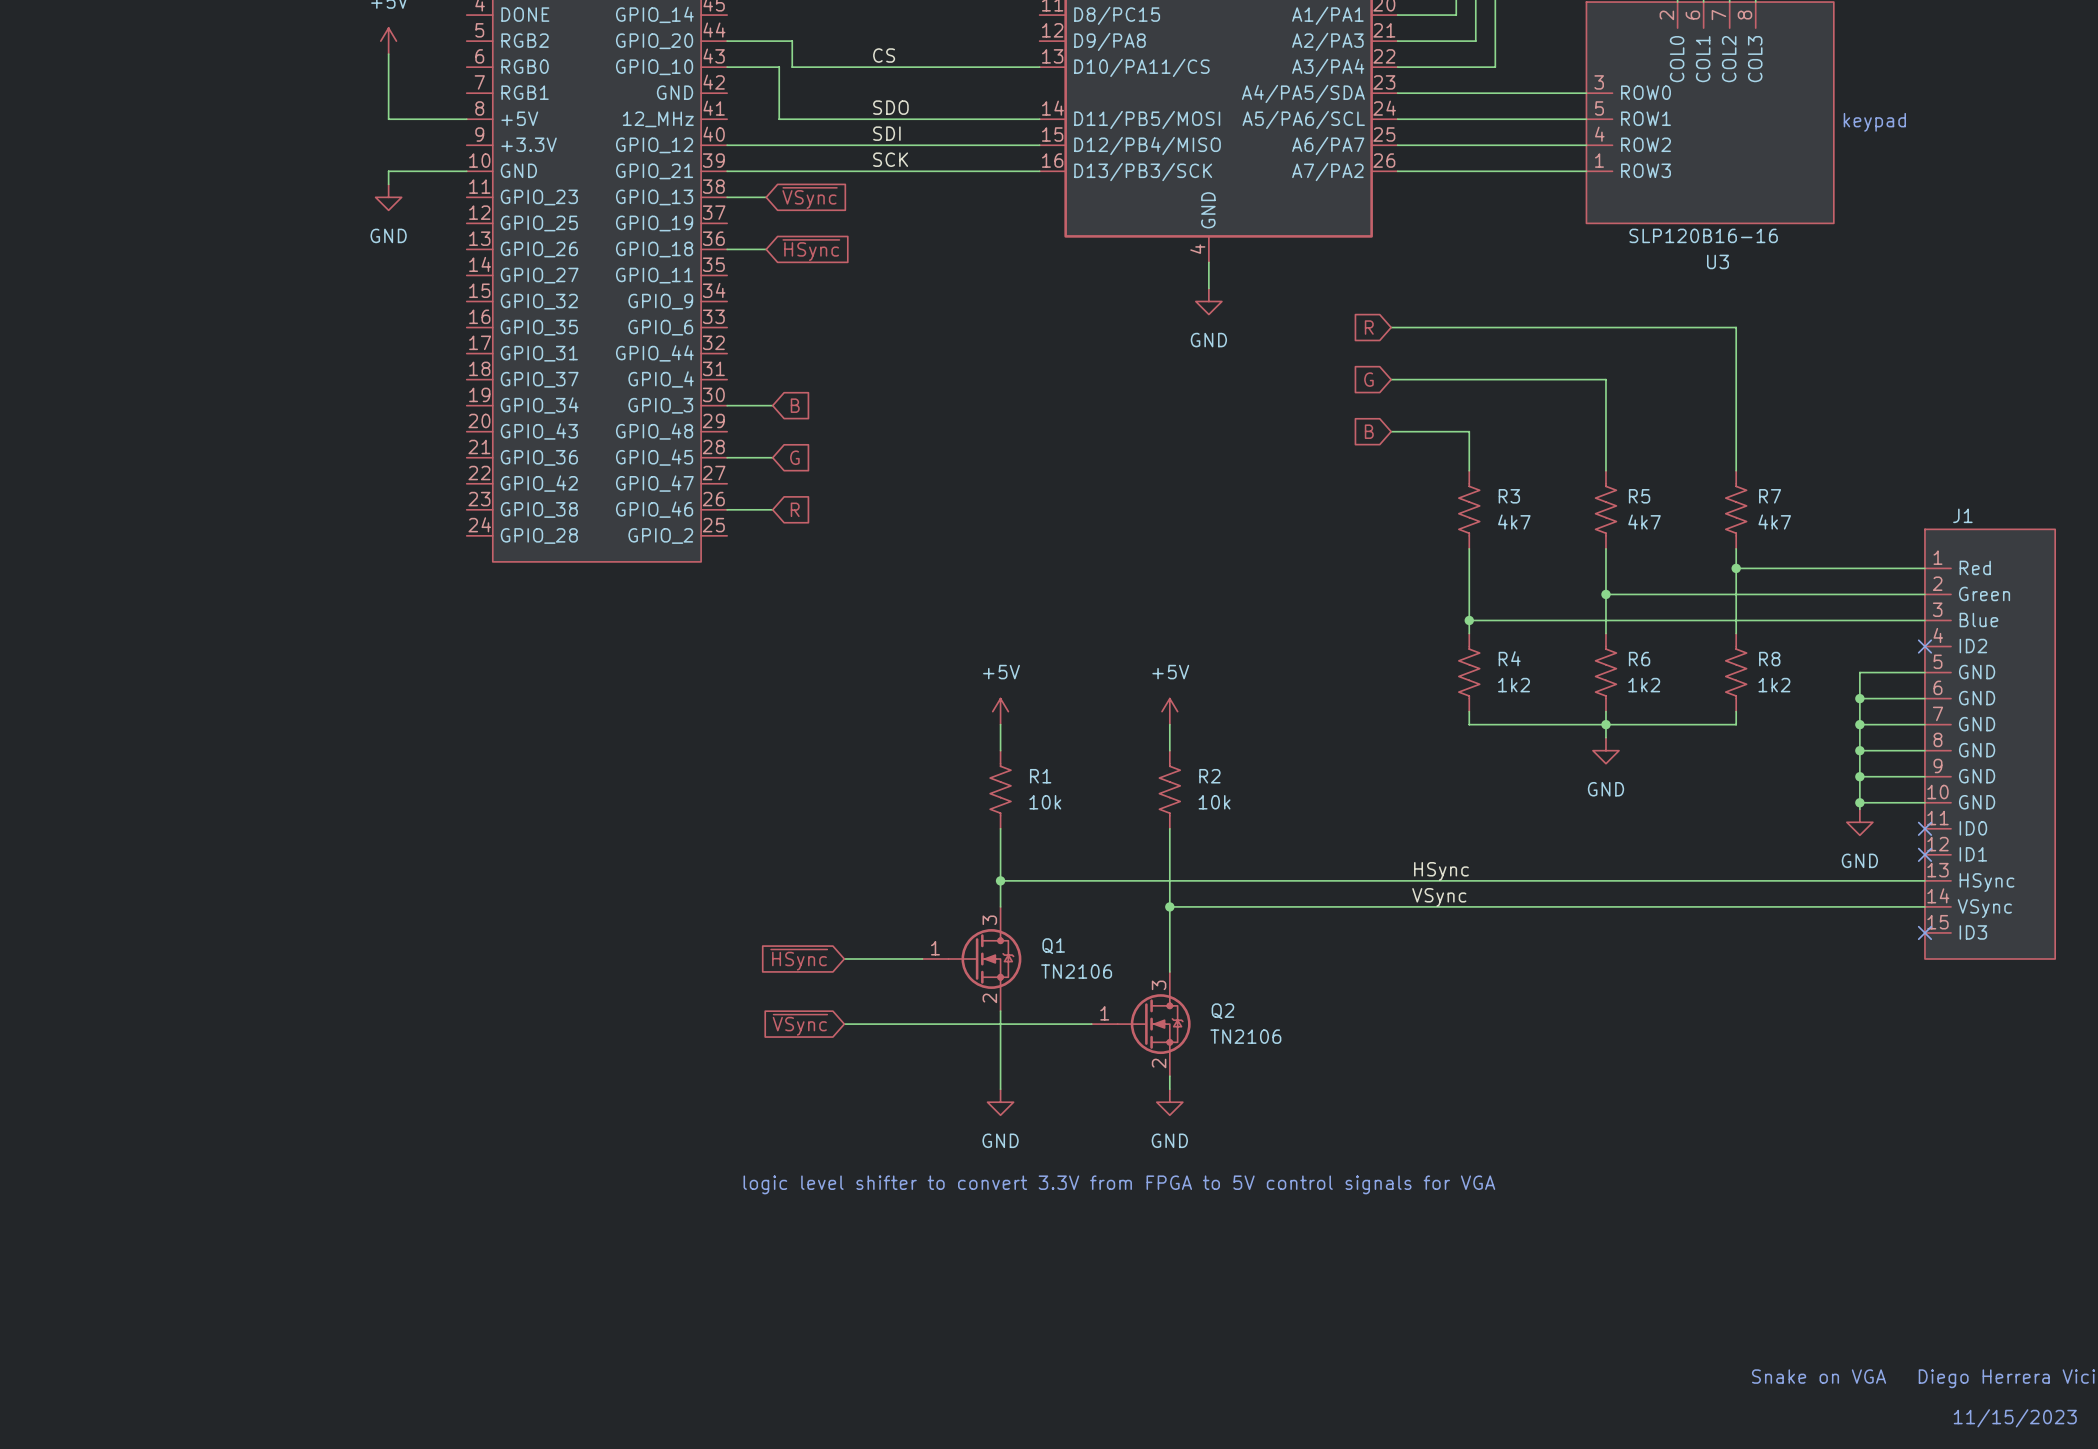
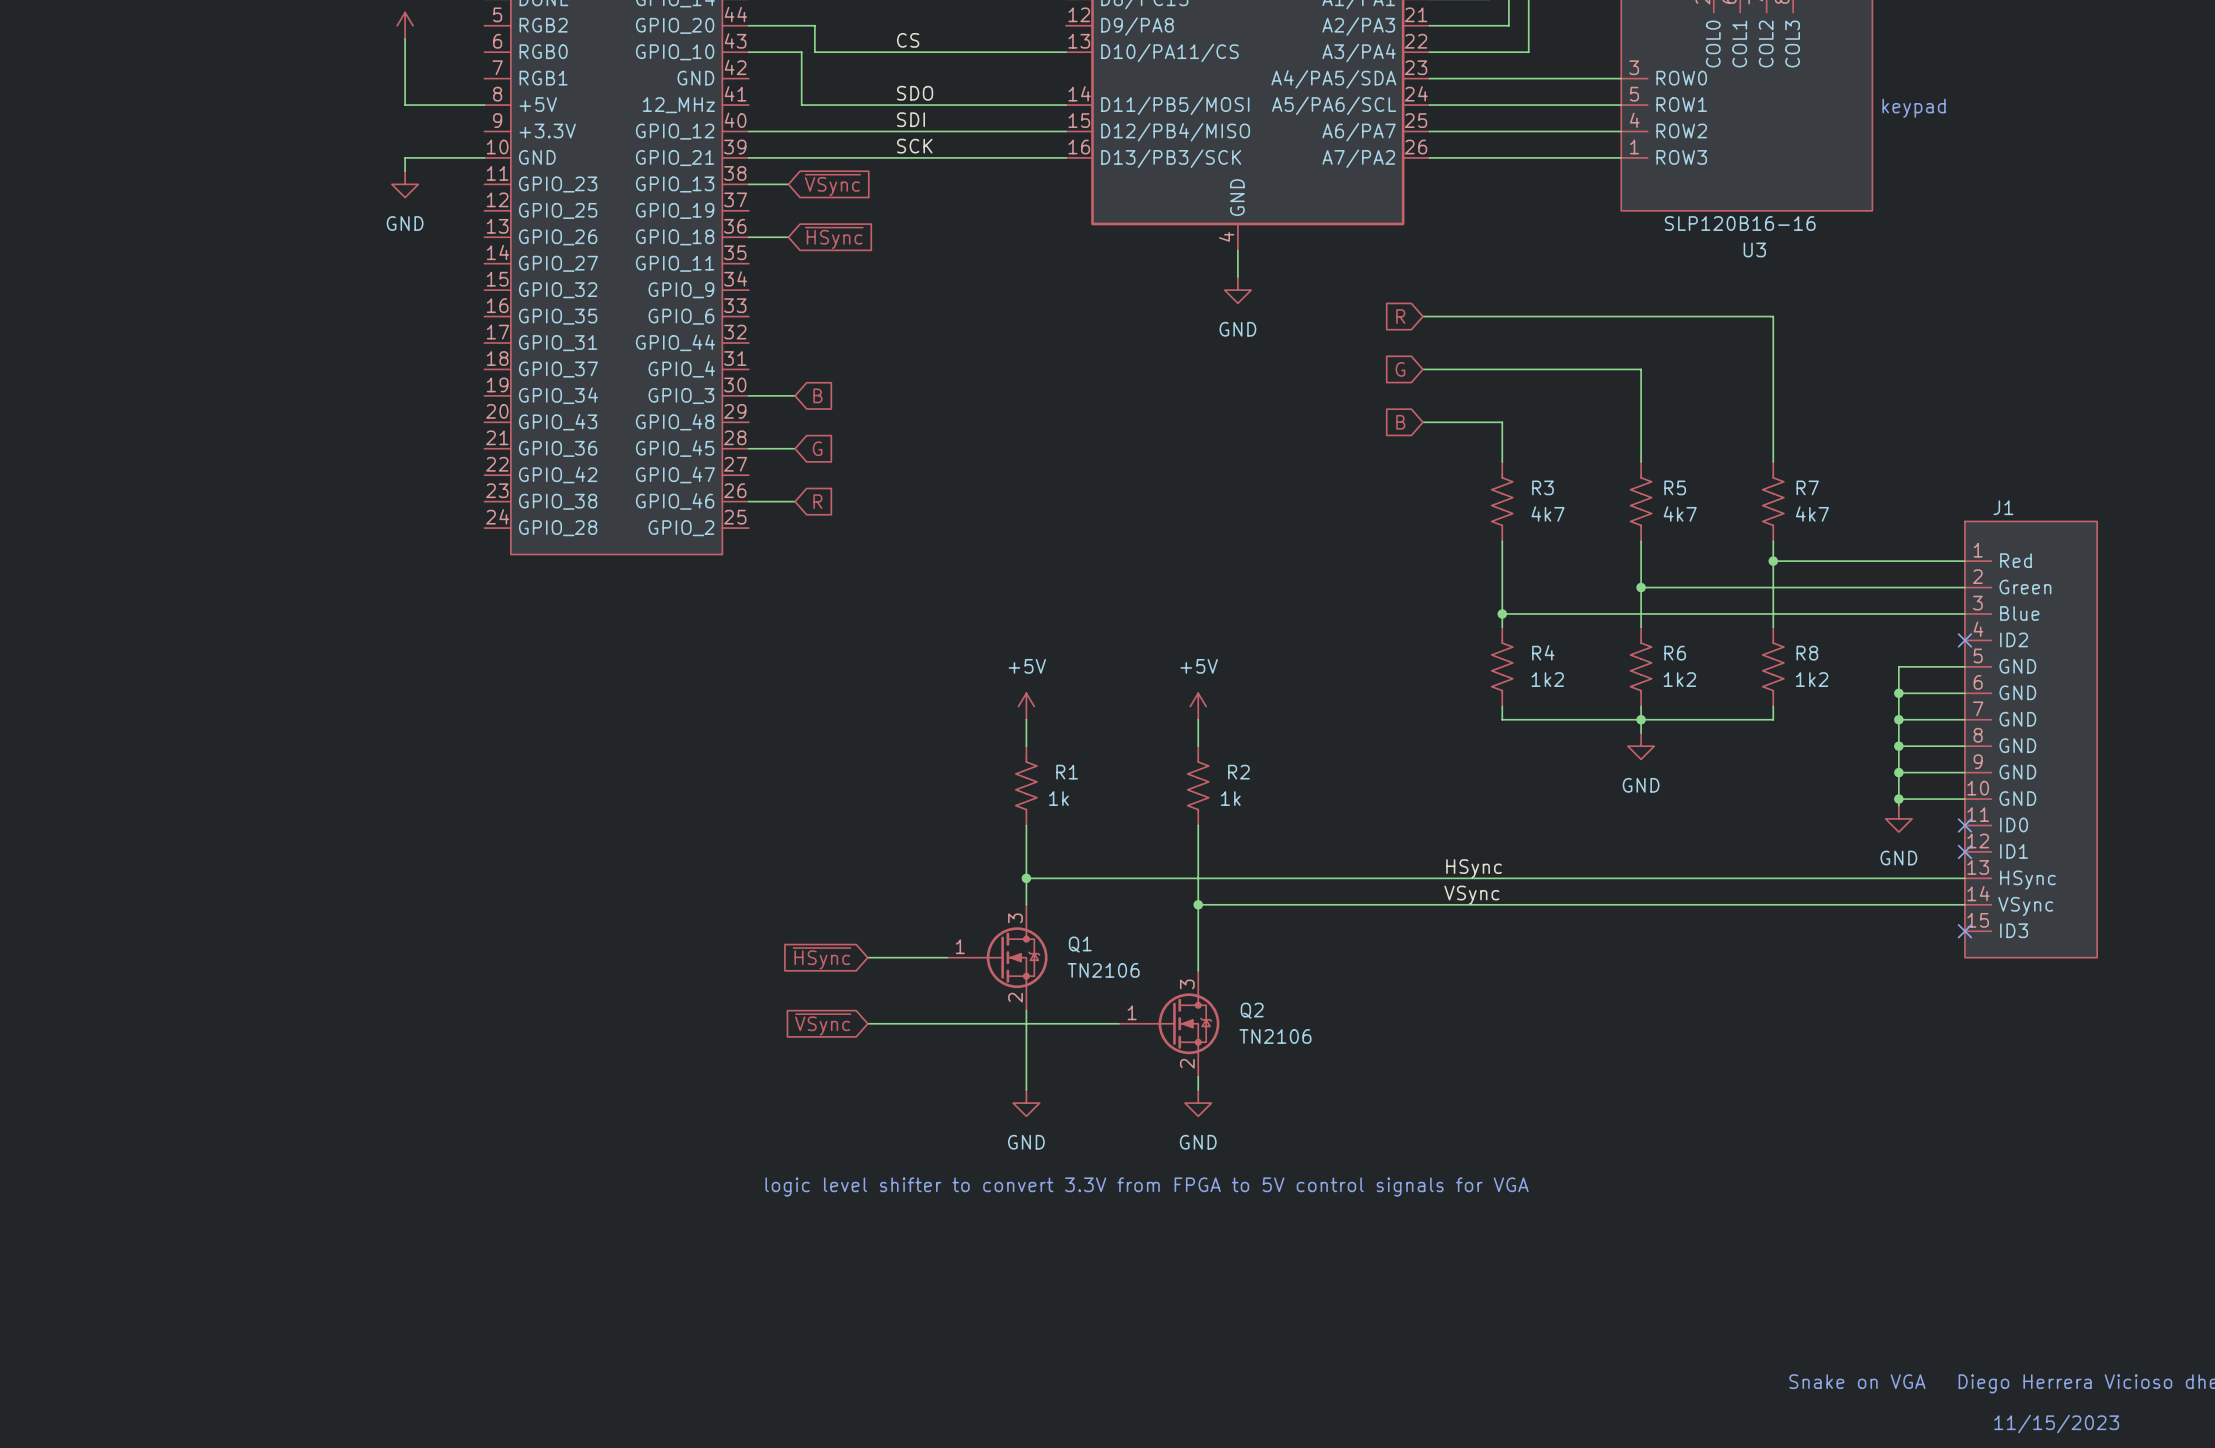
R1 value: 10k (1045, 802) -> 1k (1058, 798)
R2 value: 10k (1214, 802) -> 1k (1230, 798)

